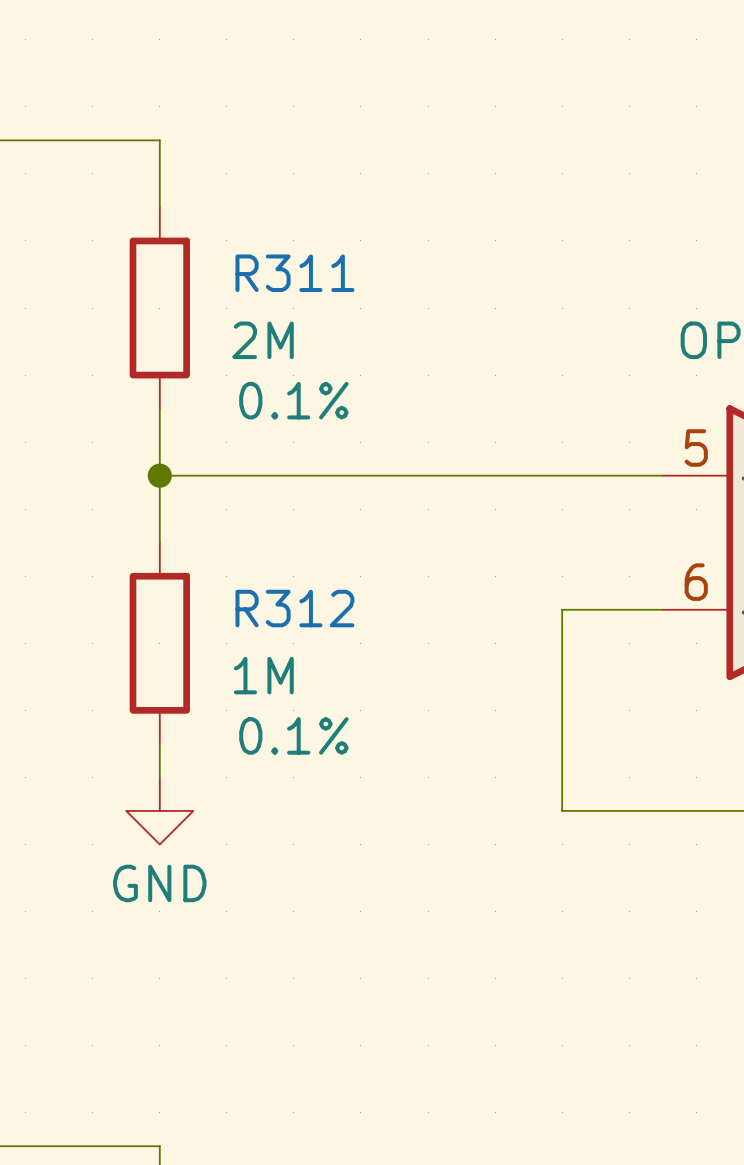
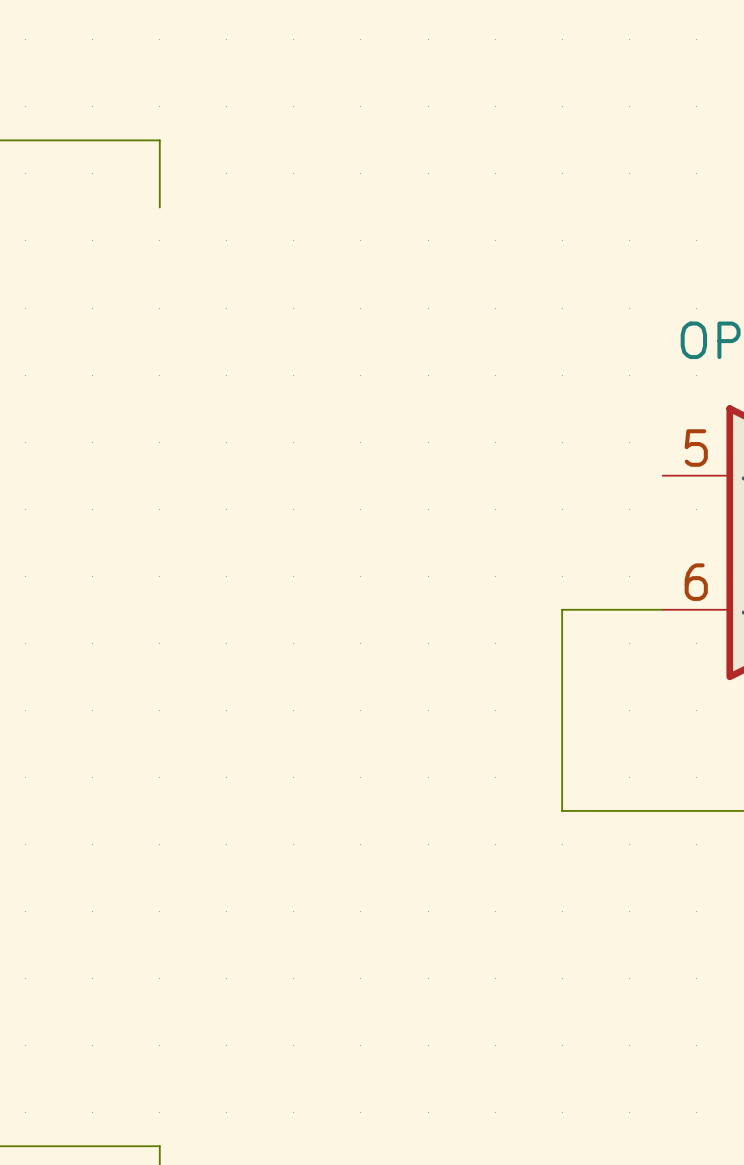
R311: 2M (159, 308) -> none
wire: (159, 408) (159, 542) -> none
wire: (159, 475) (662, 475) -> none
junction: (159, 475) -> none
R312: 1M (159, 643) -> none
wire: (159, 743) (159, 777) -> none
power symbol: GND (159, 810) -> none

